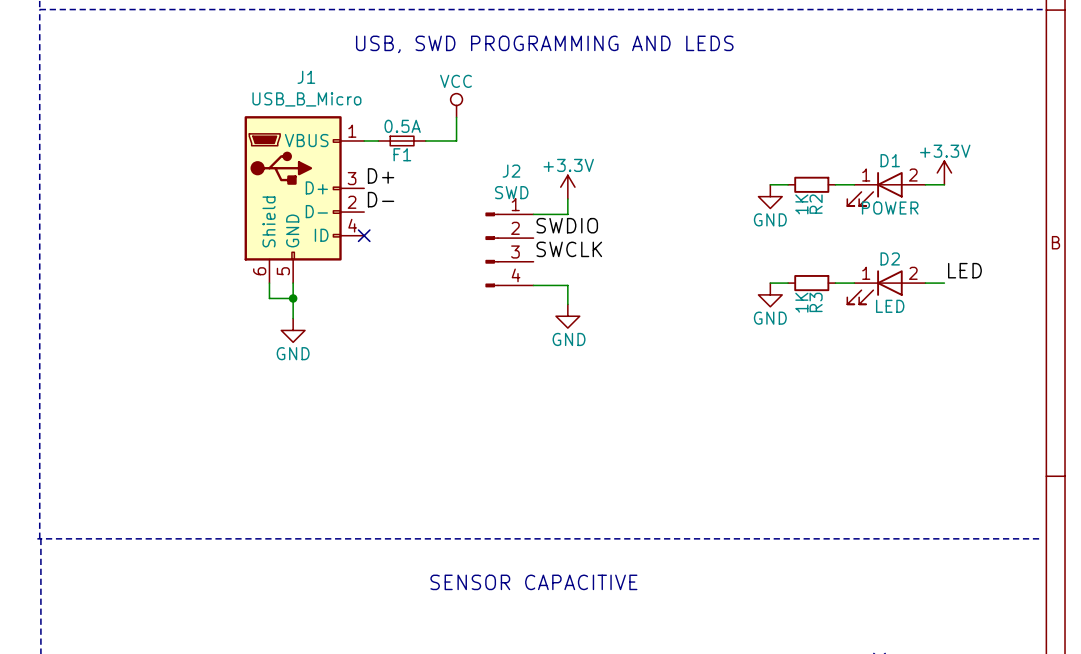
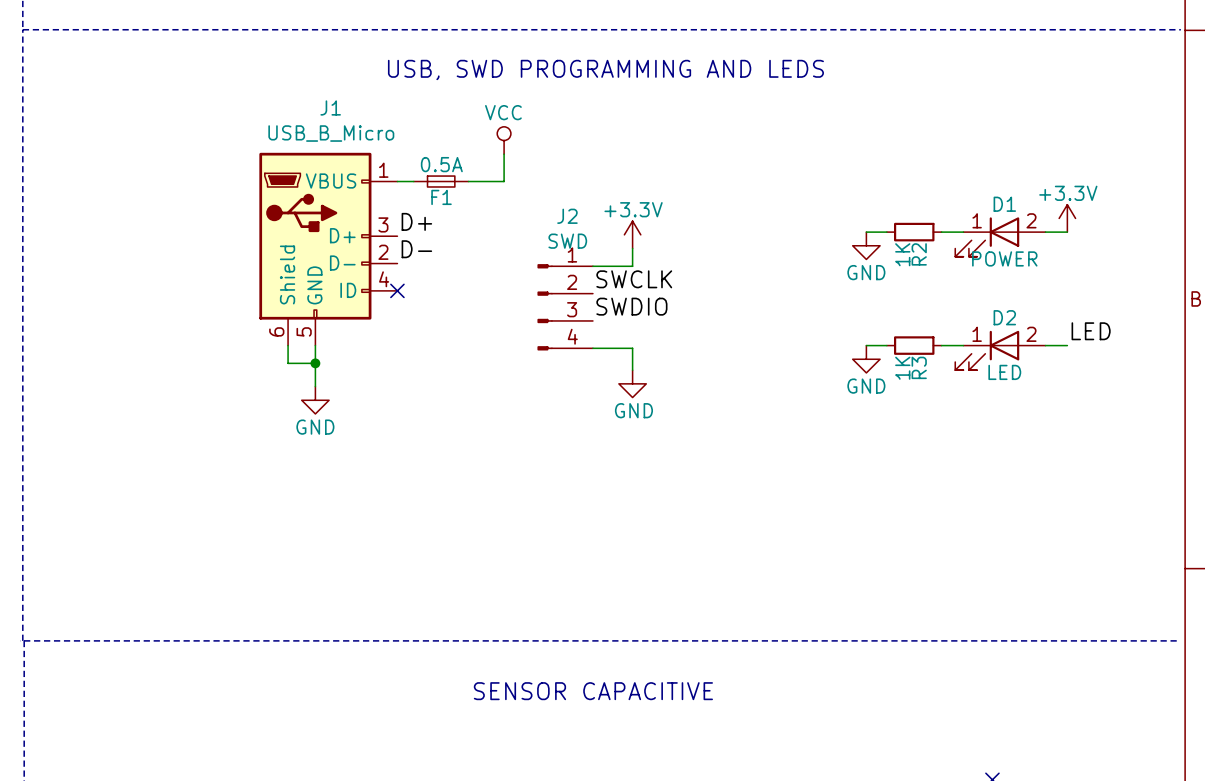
label: SWDIO (567, 225) -> SWCLK (634, 279)
label: SWCLK (569, 249) -> SWDIO (631, 306)

